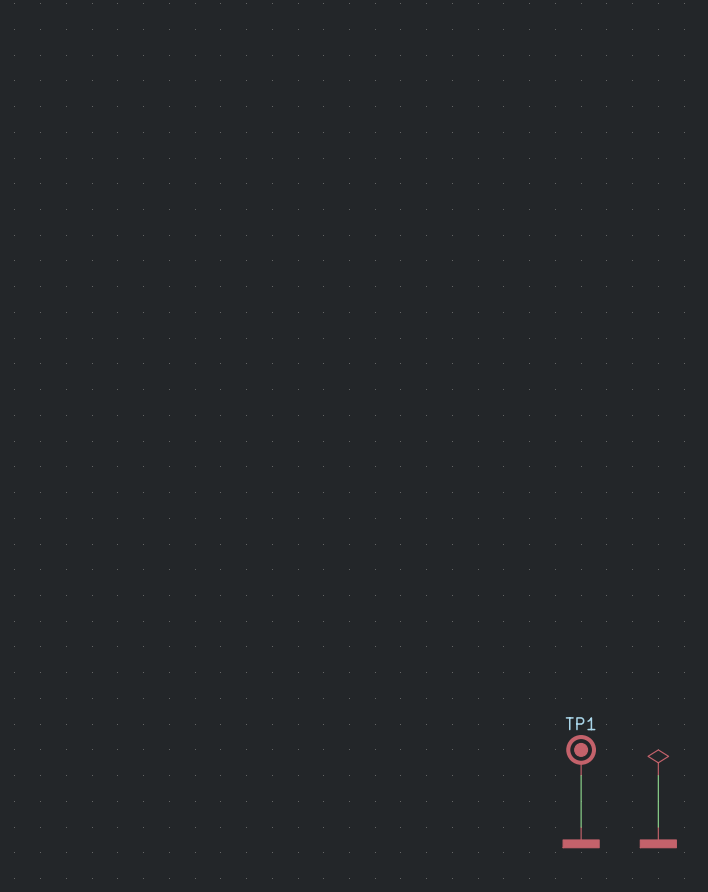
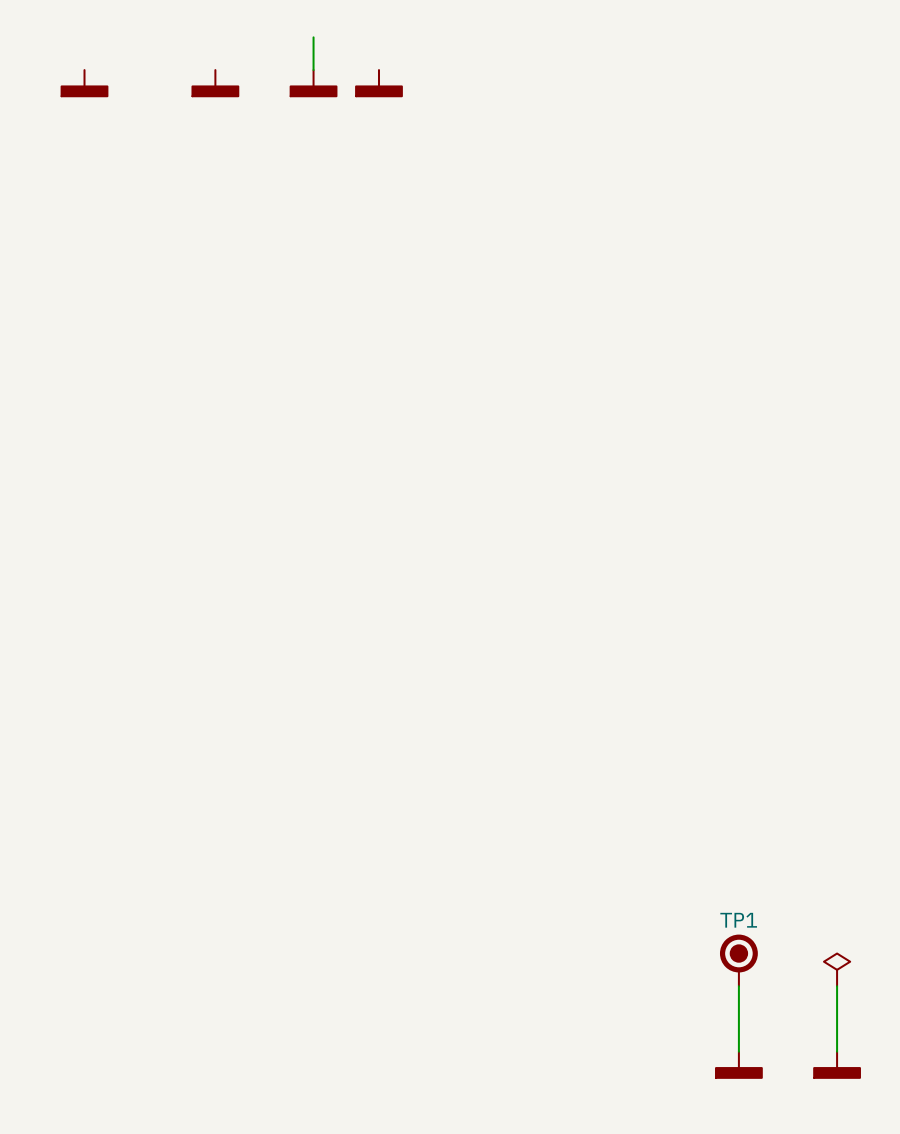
wire: none -> (313, 37) (313, 70)
power symbol: none -> (84, 83)
power symbol: none -> (215, 83)
power symbol: none -> (313, 83)
power symbol: none -> (378, 83)

